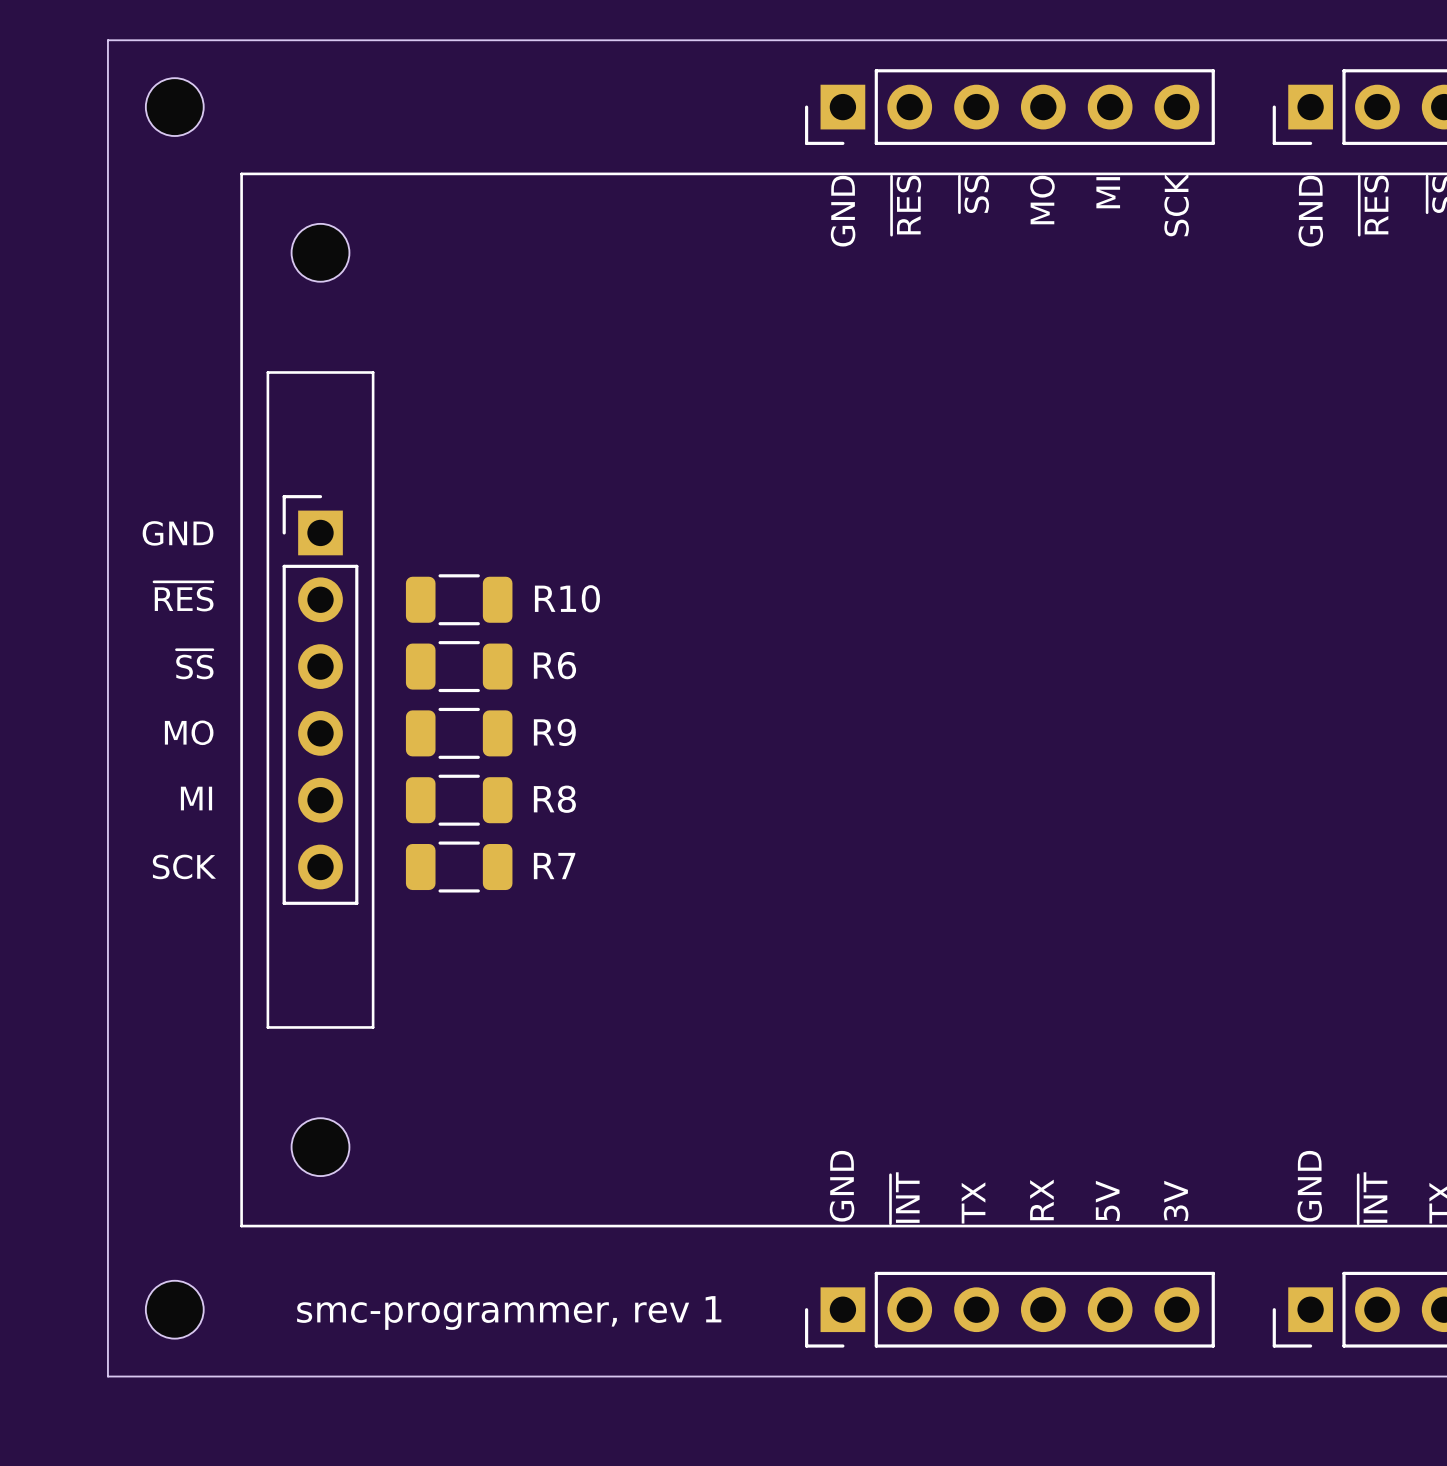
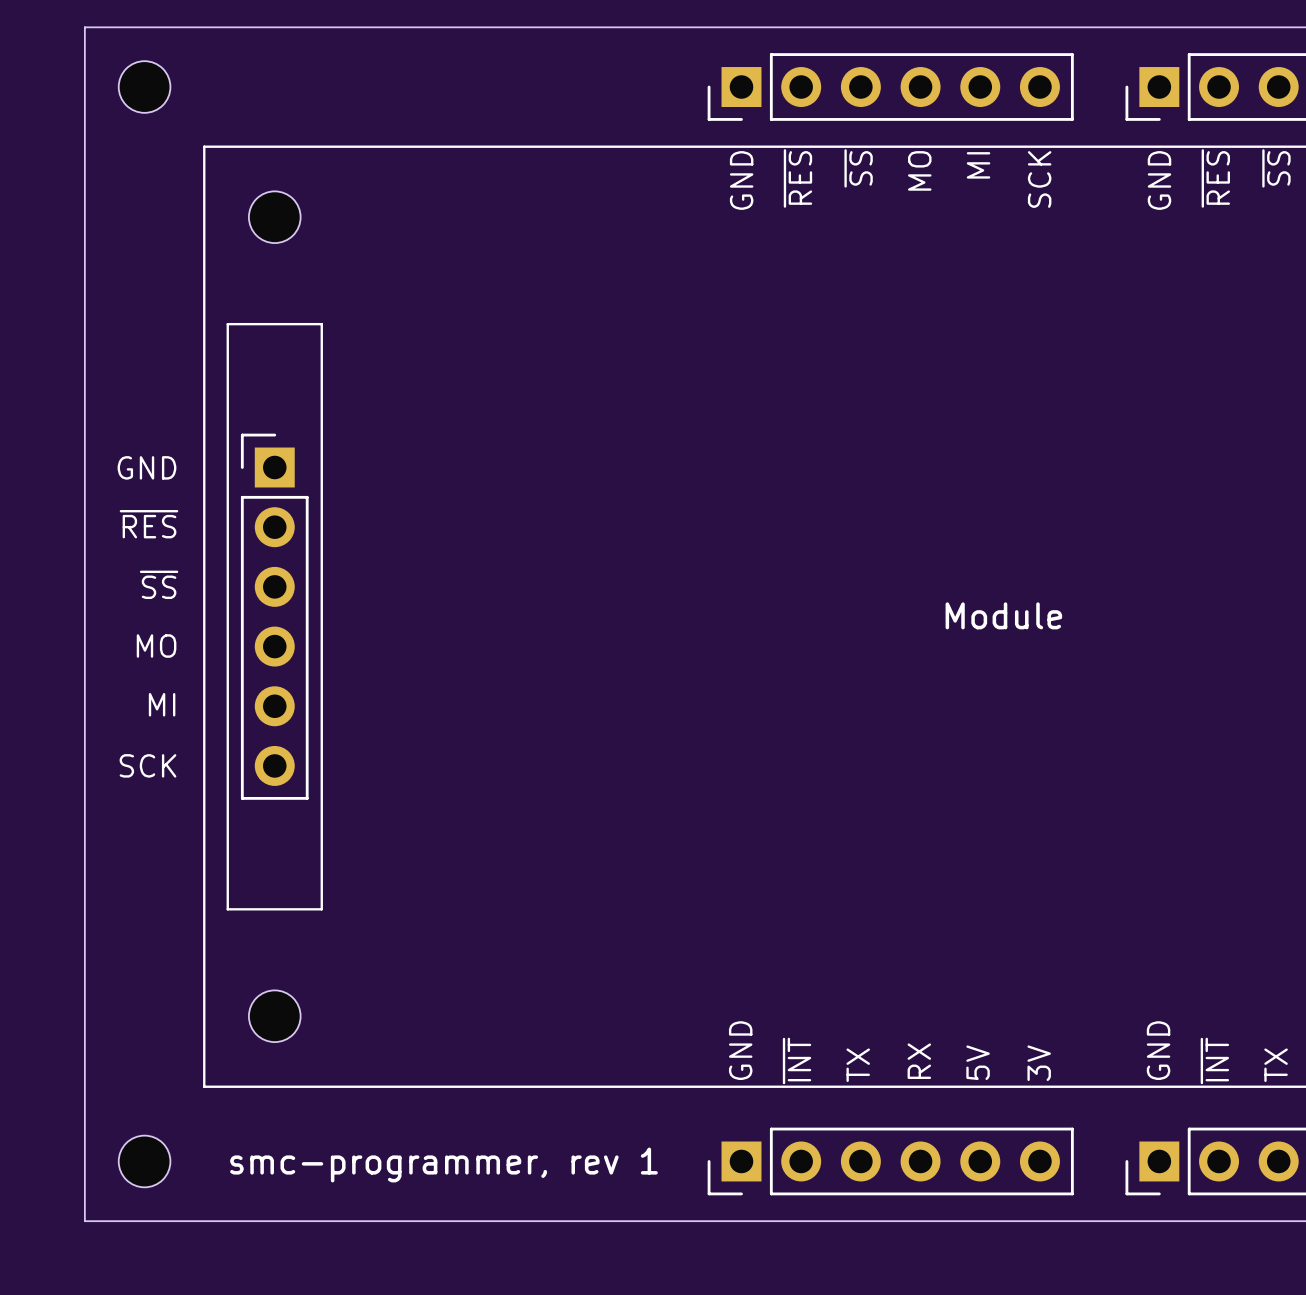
R10: (459, 599) -> none
R6: (459, 666) -> none
text: none -> Module (1003, 615)
R9: (459, 733) -> none
R8: (459, 800) -> none
R7: (459, 867) -> none

